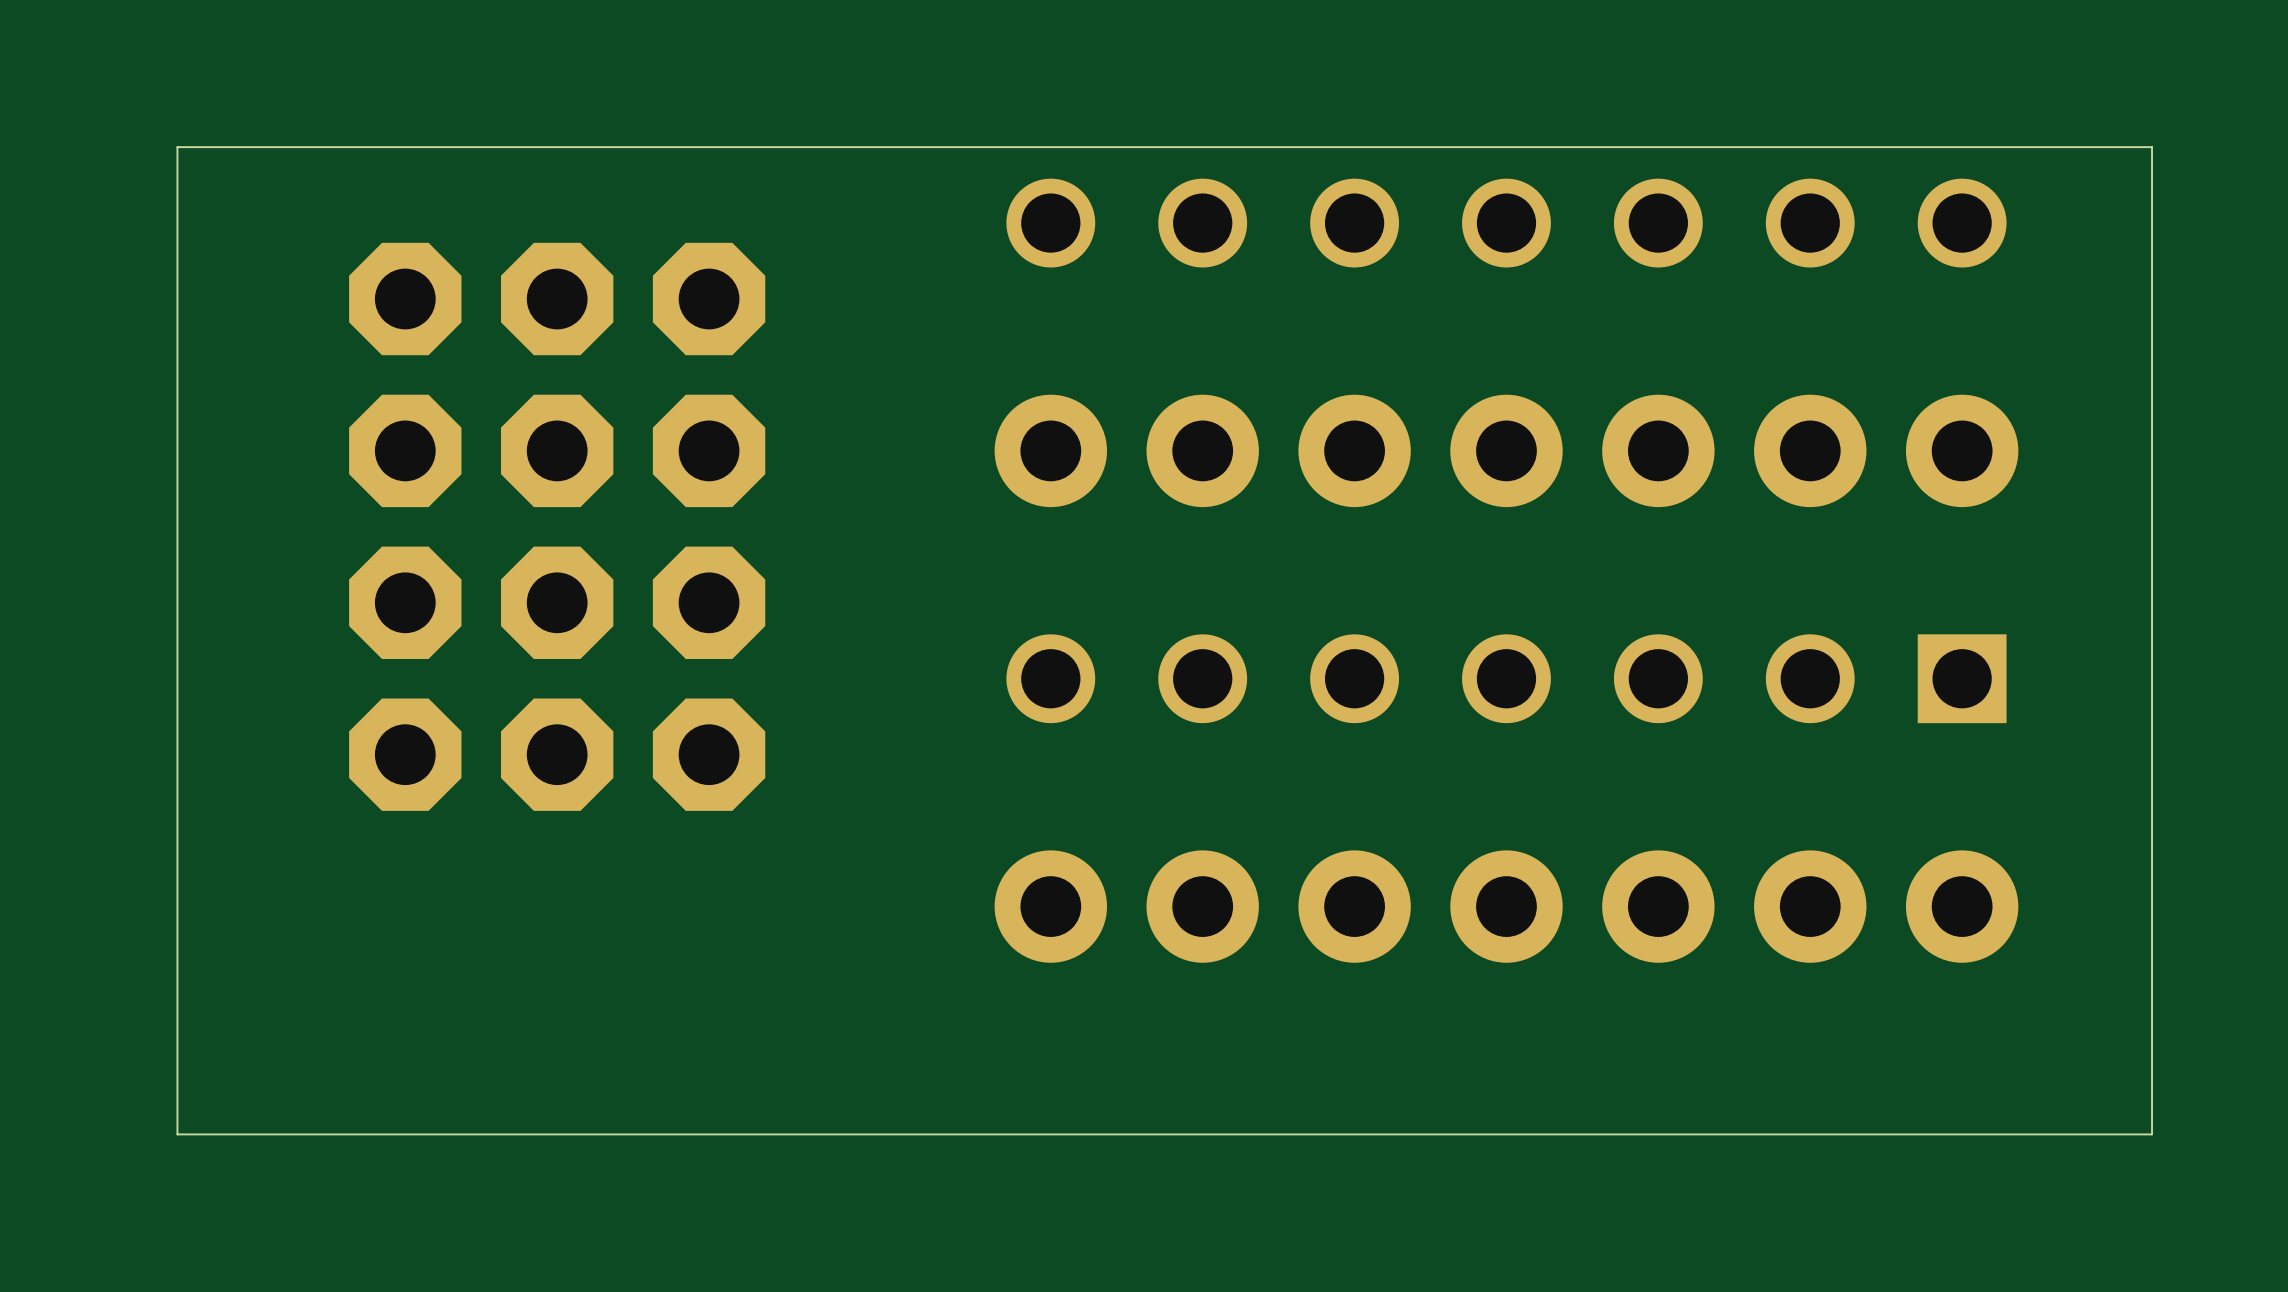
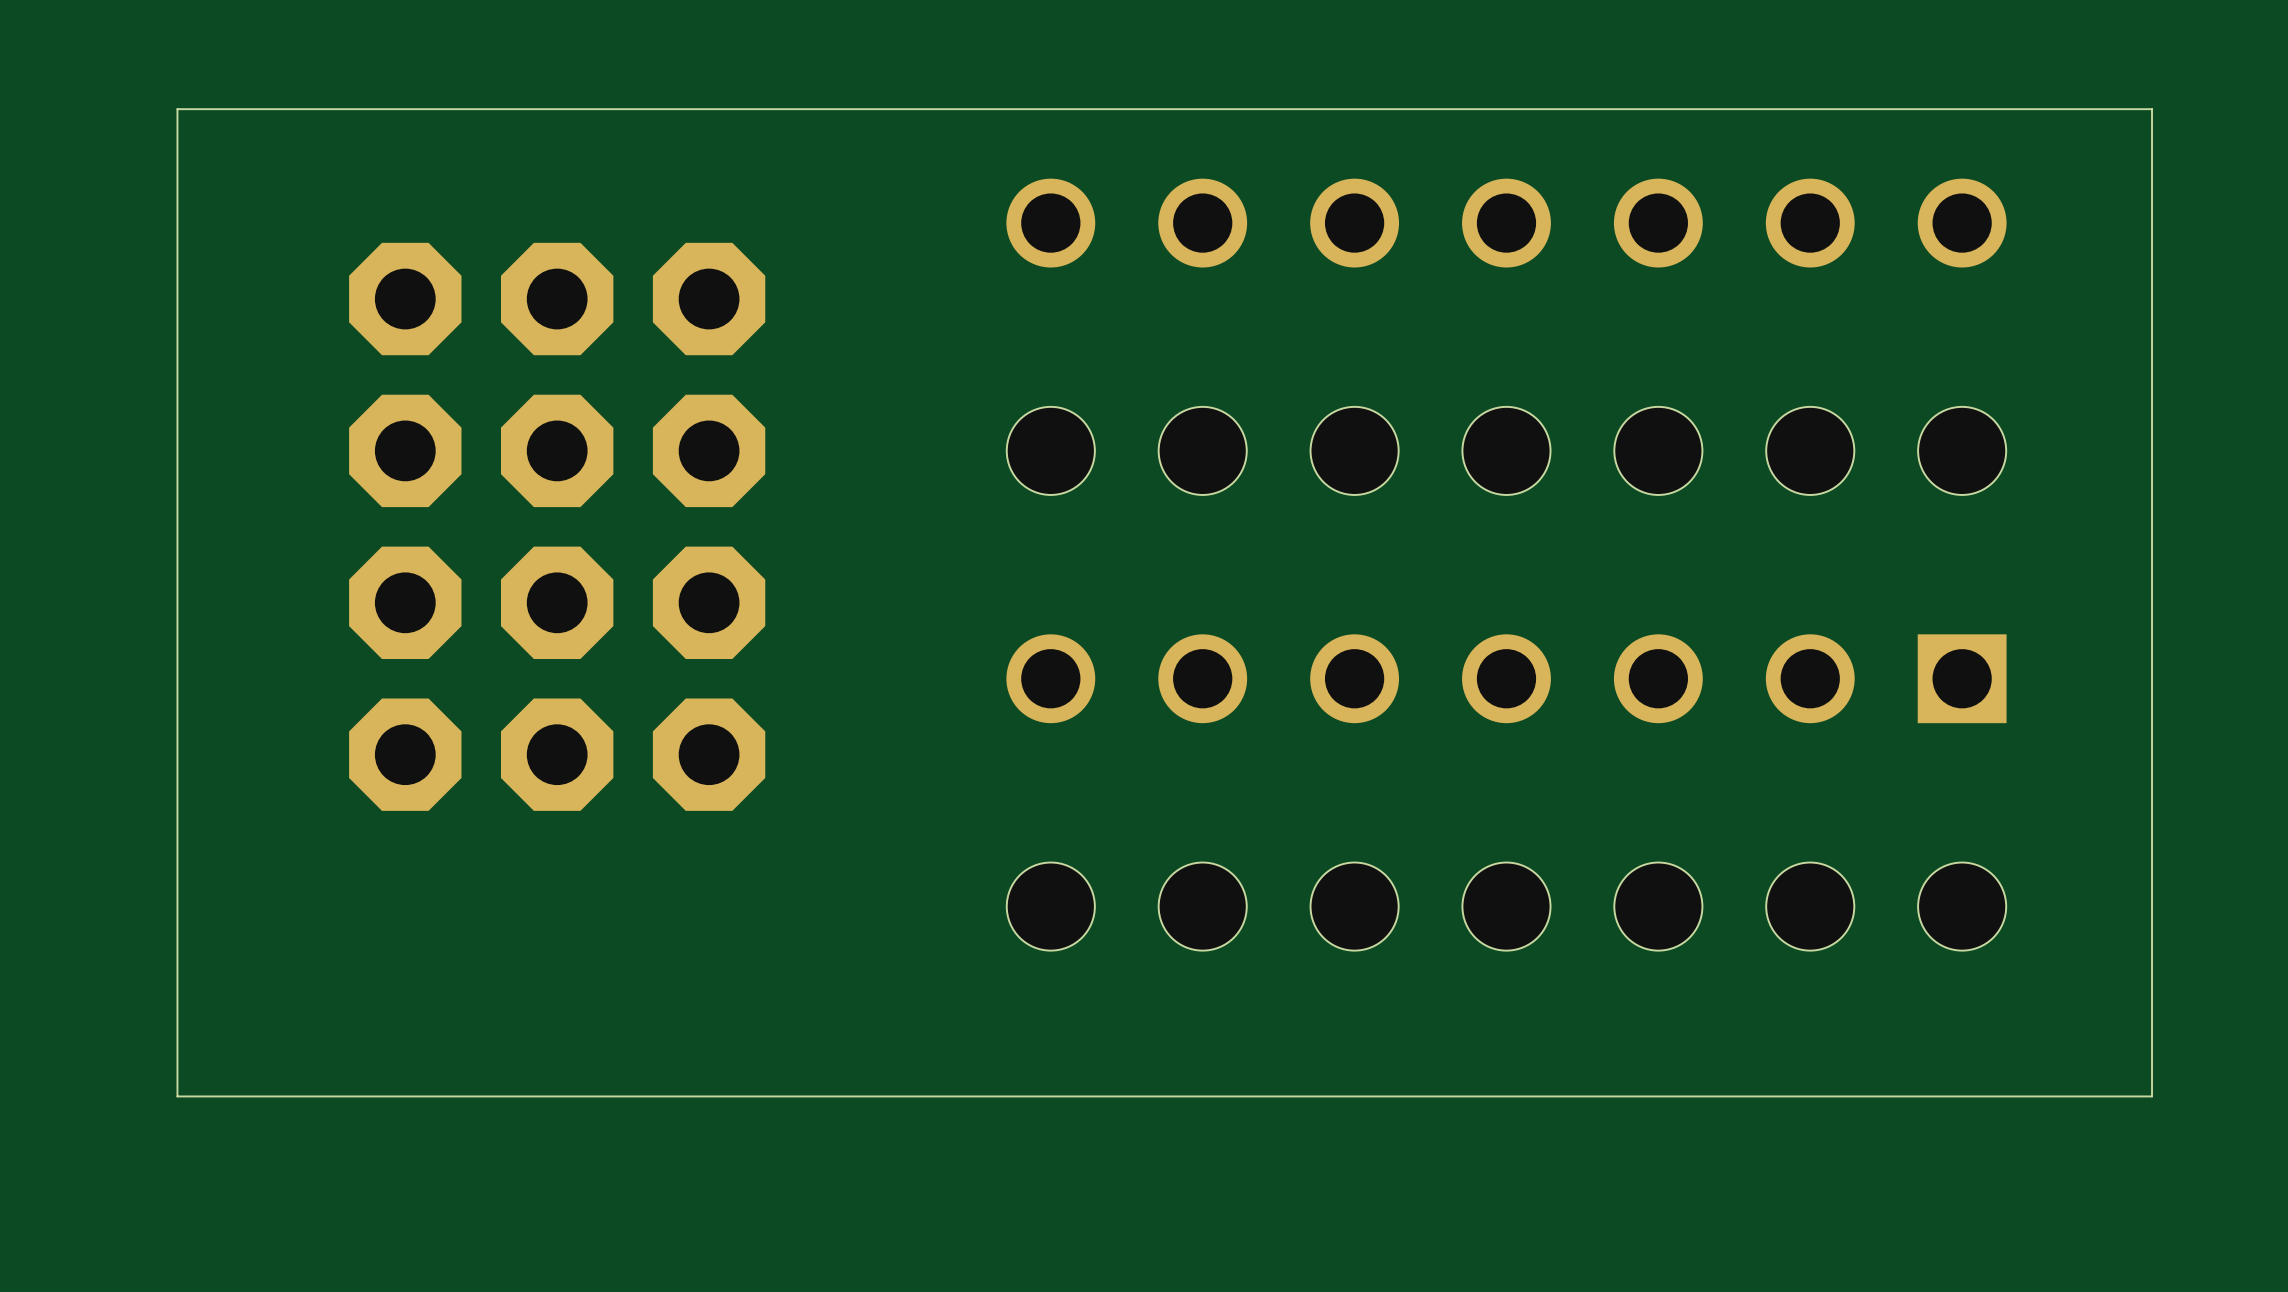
board edge: (2152, 147) (177, 147) -> (2152, 147) (2152, 109) (177, 109) (177, 147)
part footprint: [994, 394, 2019, 508] -> [1006, 406, 2007, 495]
part footprint: [994, 850, 2019, 963] -> [1006, 862, 2007, 951]
board edge: (2152, 1096) (2152, 1134) (177, 1134) (177, 1096) -> (2152, 1096) (177, 1096)

